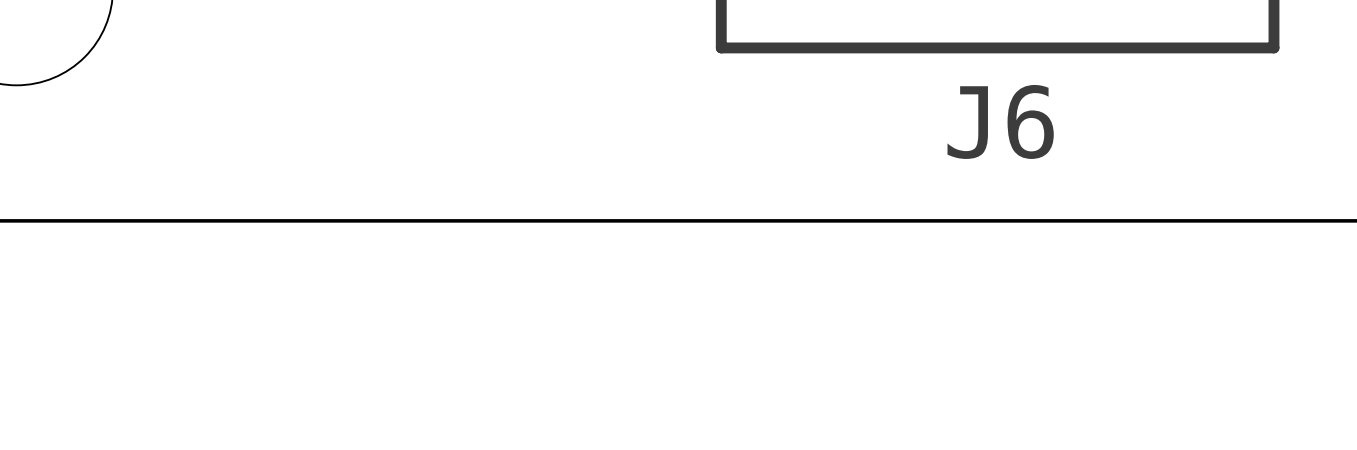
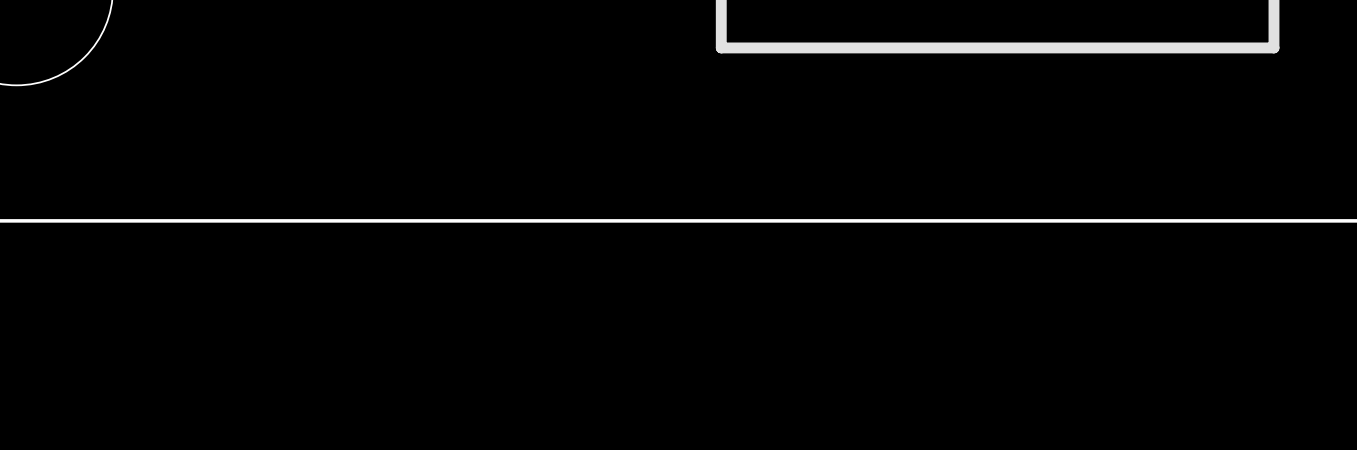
J6 name: J6 (1000, 121) -> none

